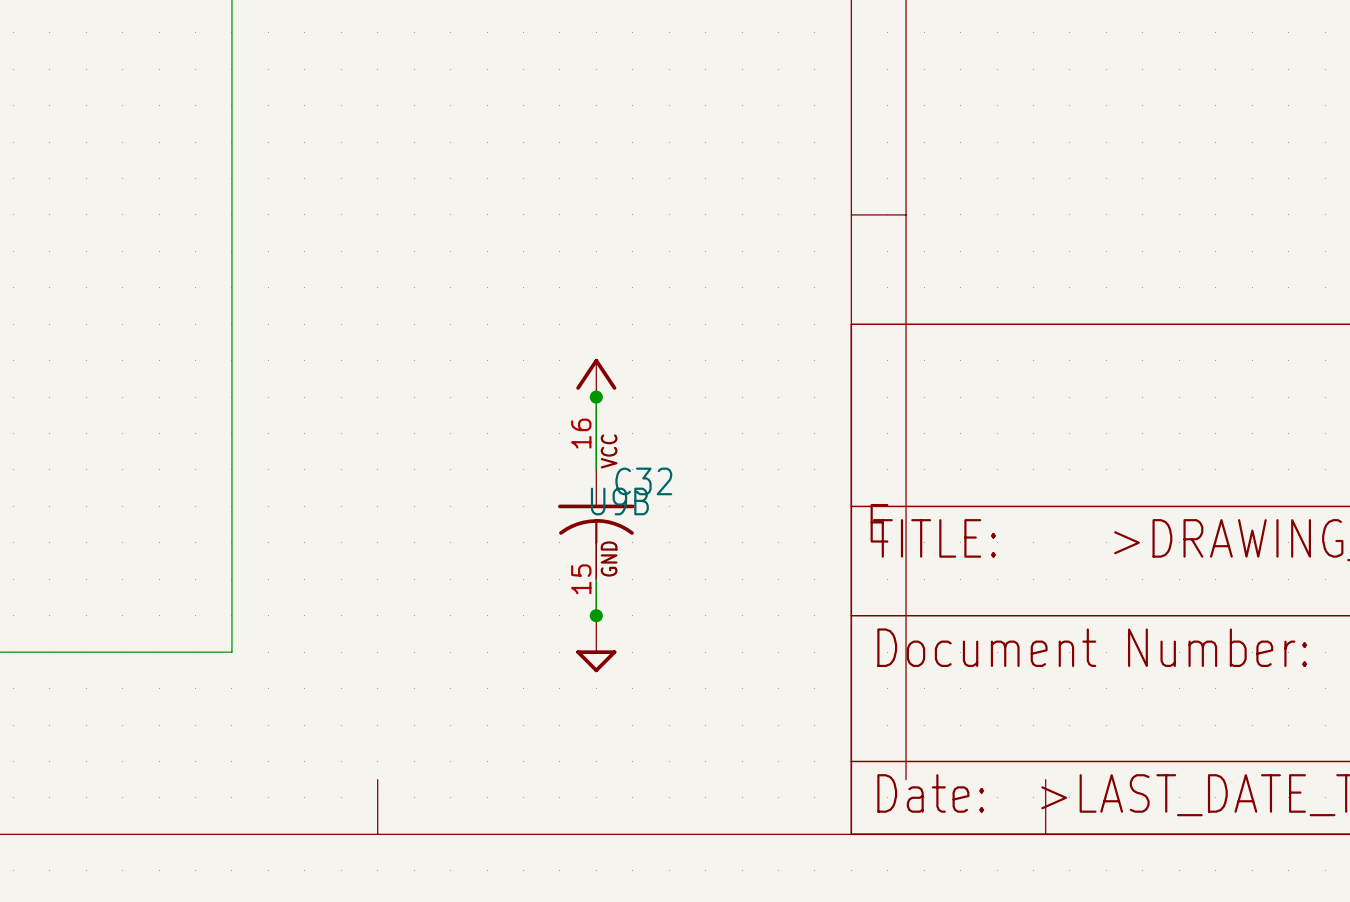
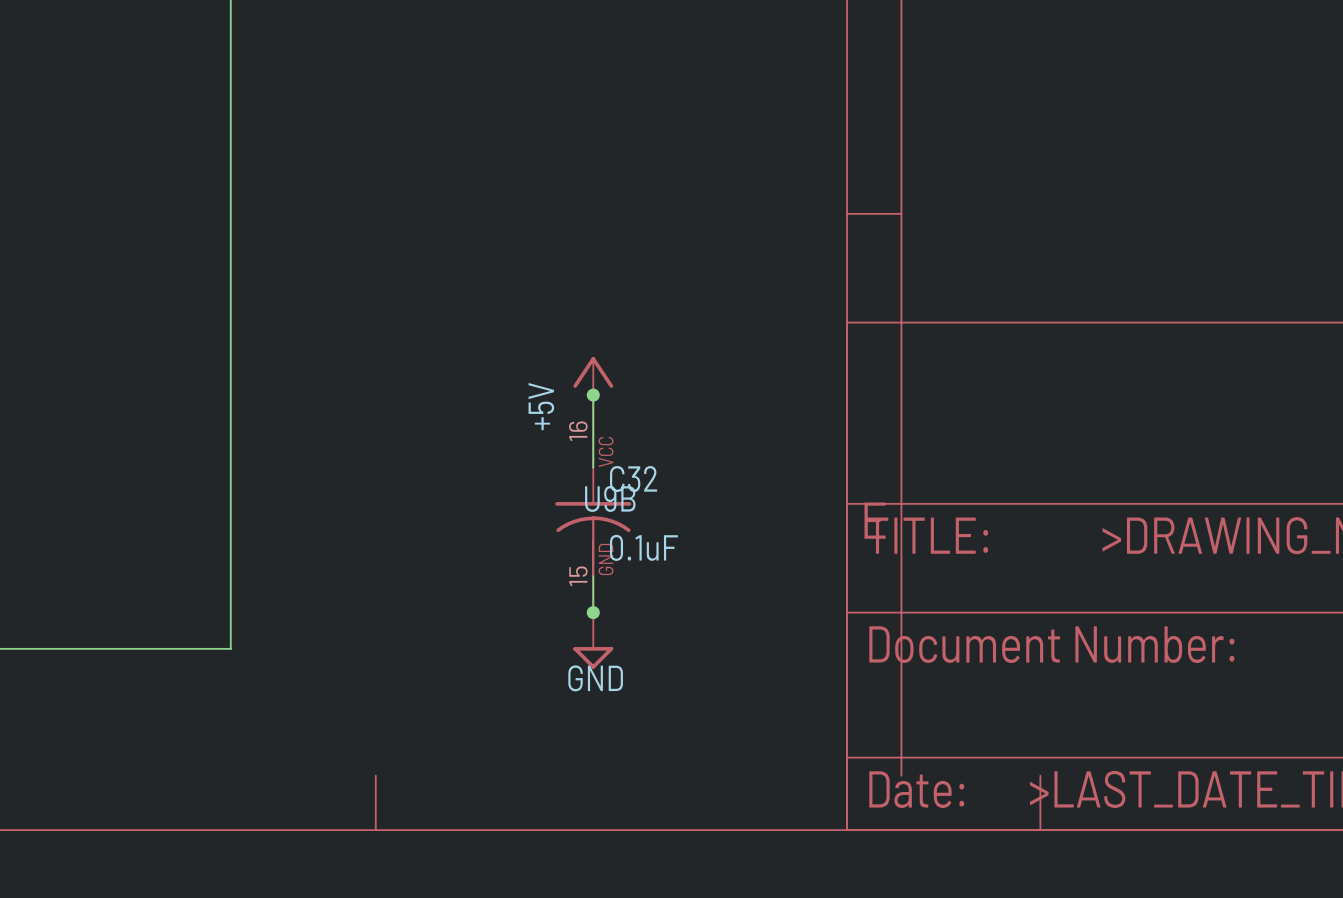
power symbol text: none -> +5V (541, 406)
C32 value: none -> 0.1uF (643, 547)
power symbol text: none -> GND (595, 678)

